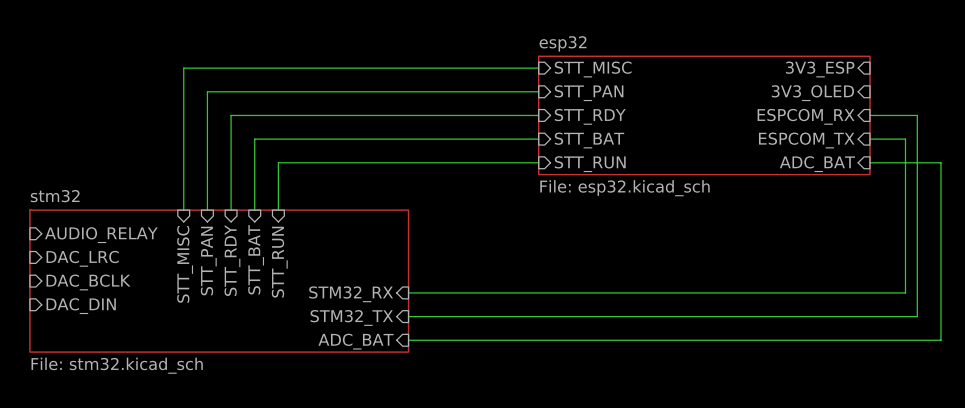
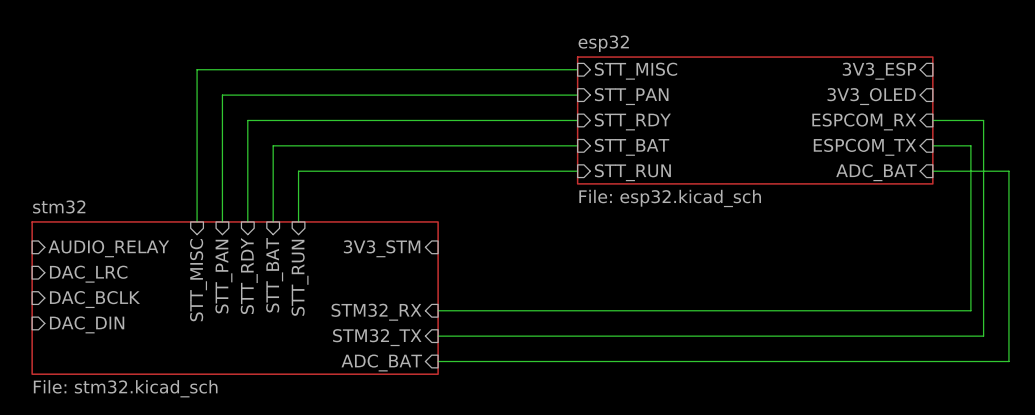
sheet pin: none -> 3V3_STM (382, 248)

